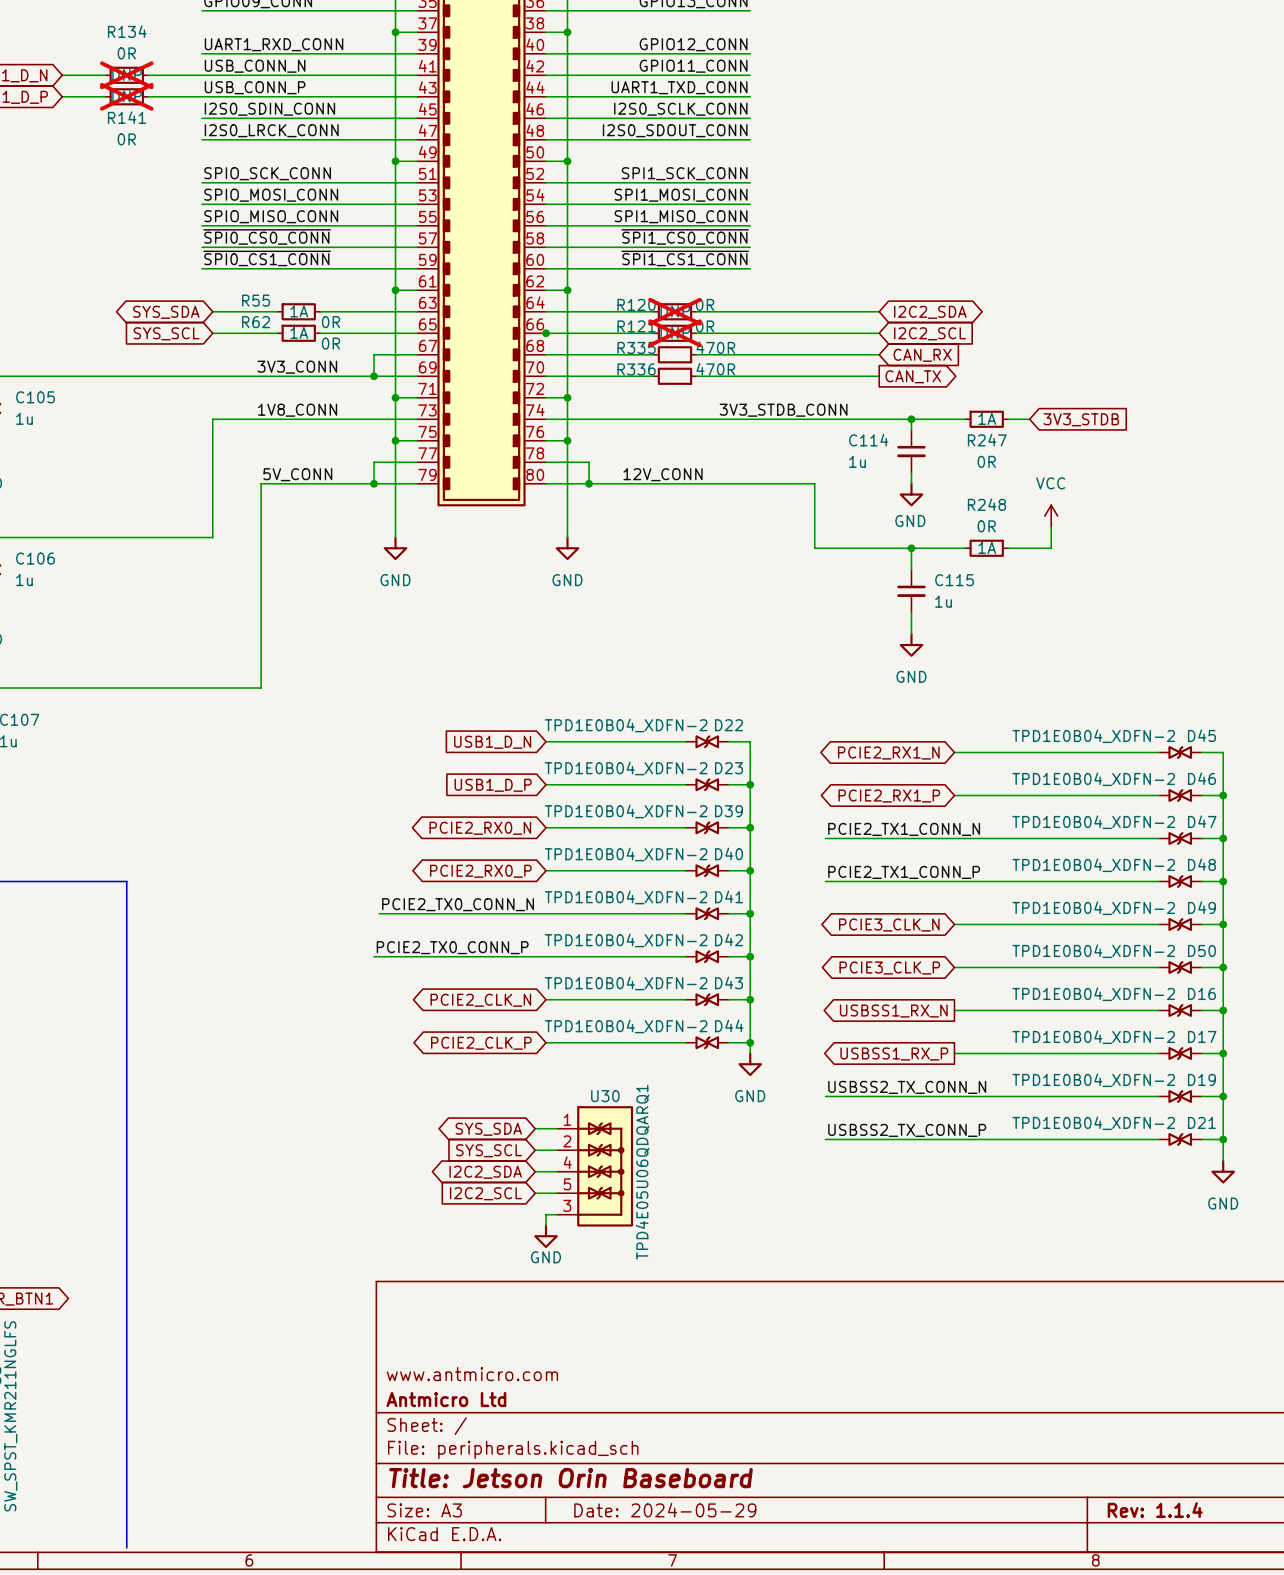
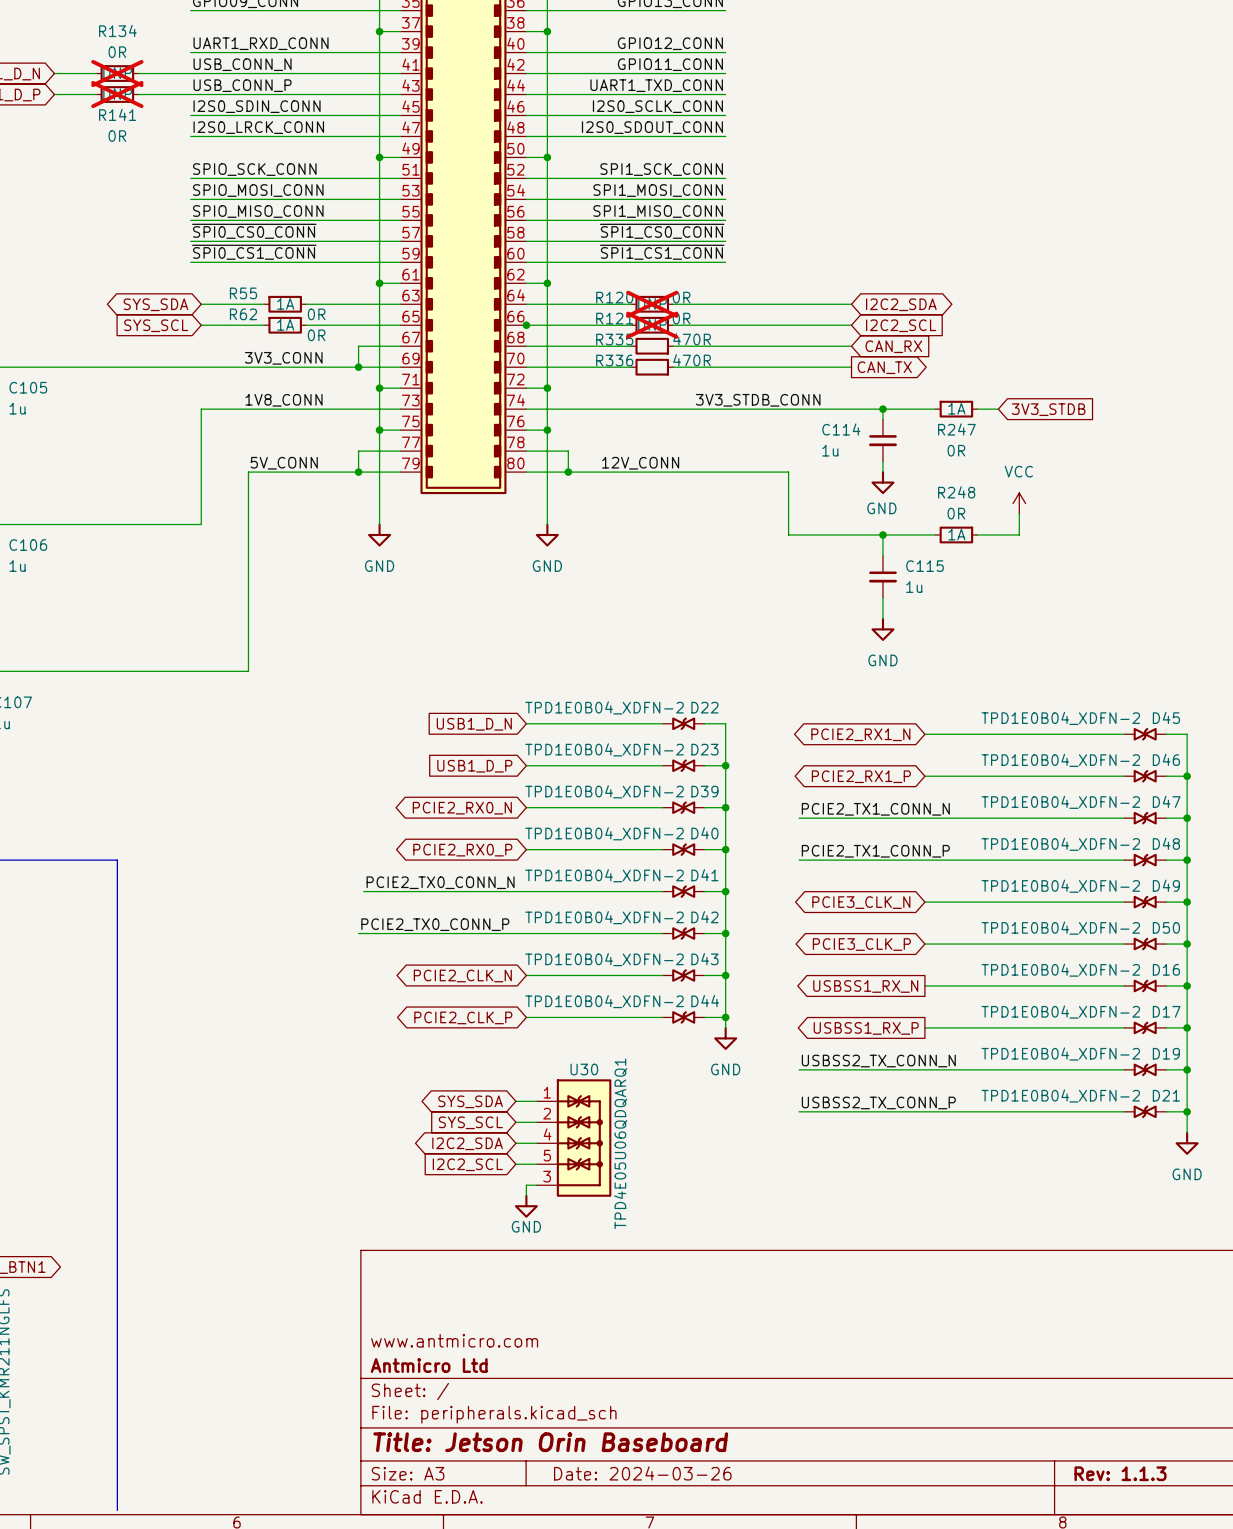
title block: Date: 2024-05-29 (665, 1510) -> Date: 2024-03-26 (642, 1473)
title block: Rev: 1.1.4 (1155, 1510) -> Rev: 1.1.3 (1120, 1473)

